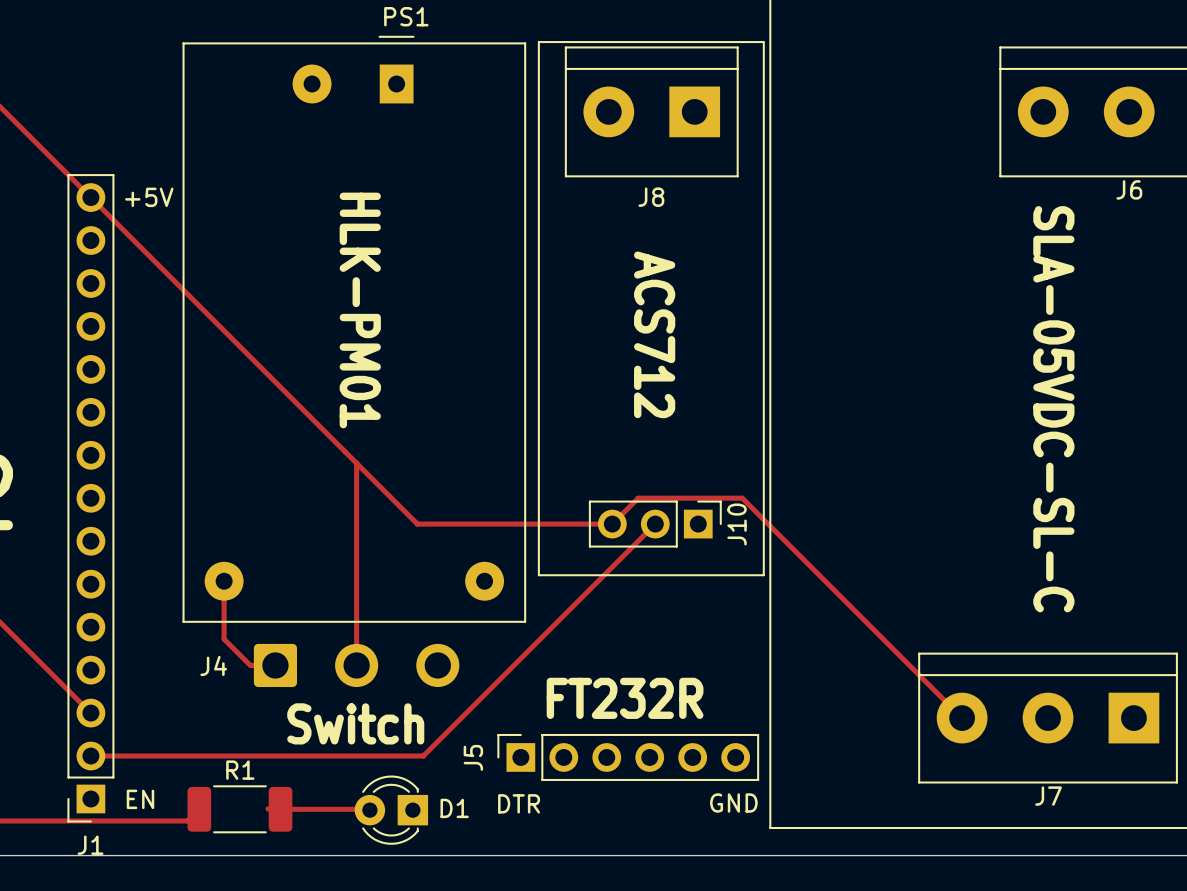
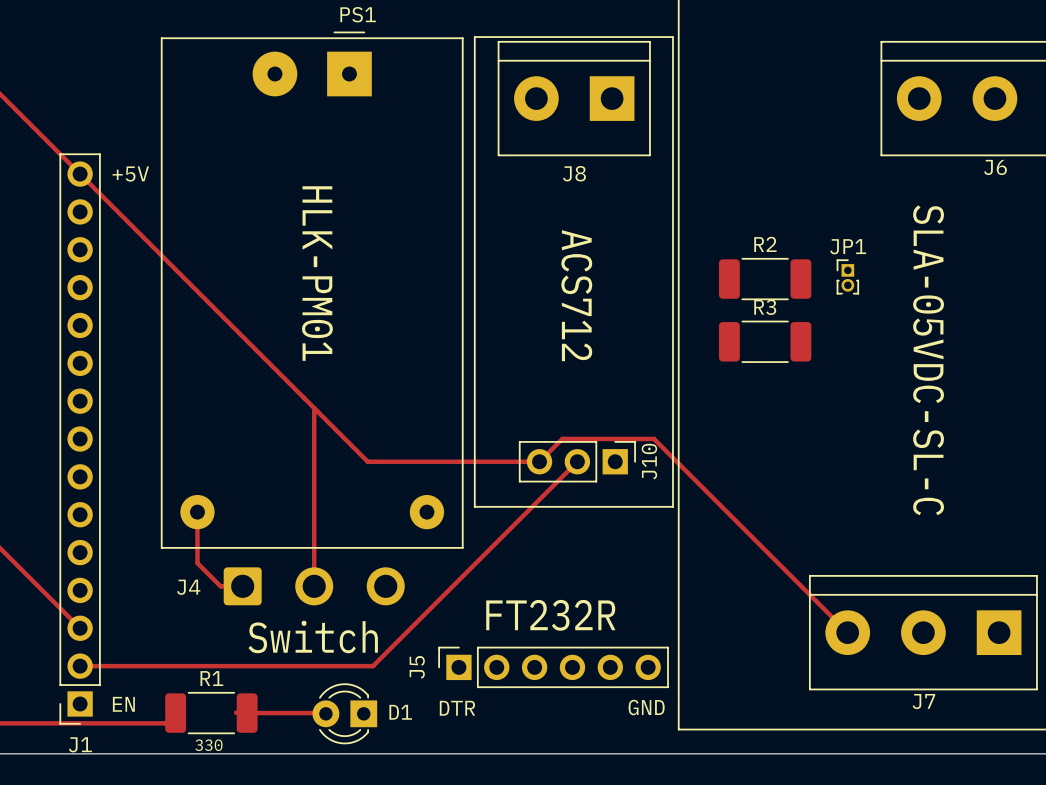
PS1 footprint: [182, 35, 527, 623] -> [160, 31, 464, 549]
JP1: none -> (847, 276)
R2: none -> (765, 279)
R3: none -> (765, 341)
text: none -> 330 (208, 745)

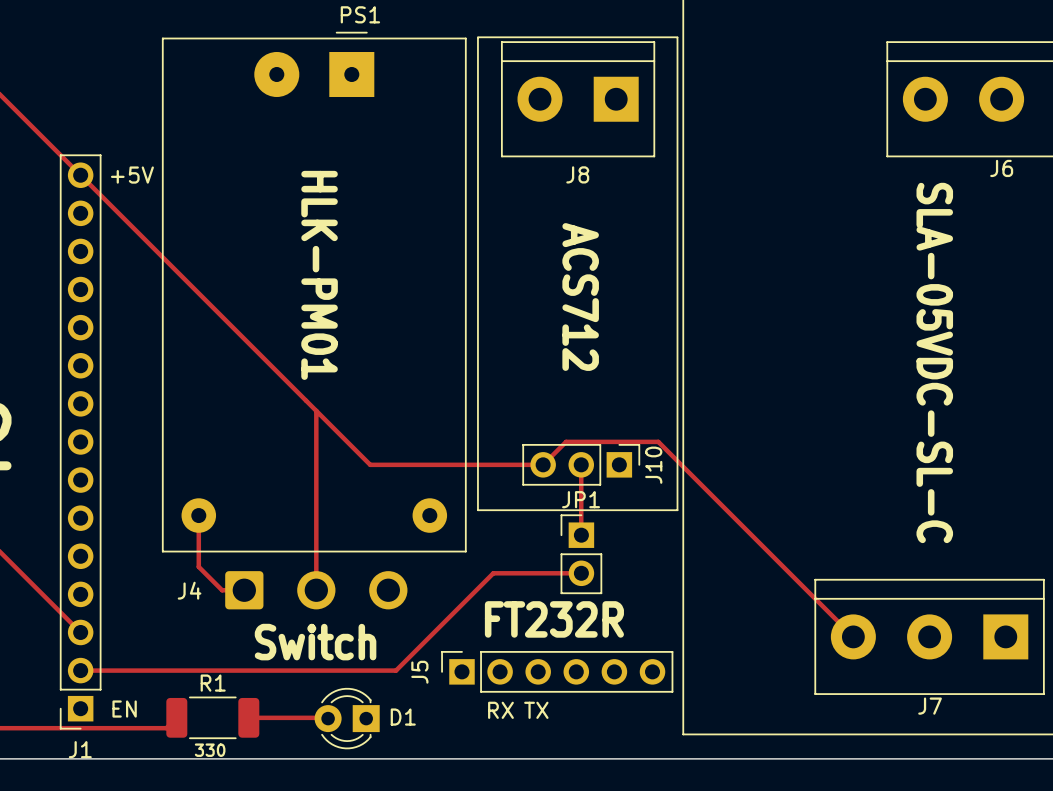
JP1 footprint: [836, 259, 860, 295] -> [560, 514, 603, 595]
R2: (765, 279) -> none
R3: (765, 341) -> none
track: (577, 461) (373, 666) -> (581, 573) (493, 573) (396, 670) (375, 670)
track: none -> (581, 464) (581, 535)
text: none -> RX (500, 710)
text: none -> TX (536, 710)
text: GND (646, 707) -> none
text: DTR (457, 708) -> none
track: (236, 712) (236, 712) -> none

